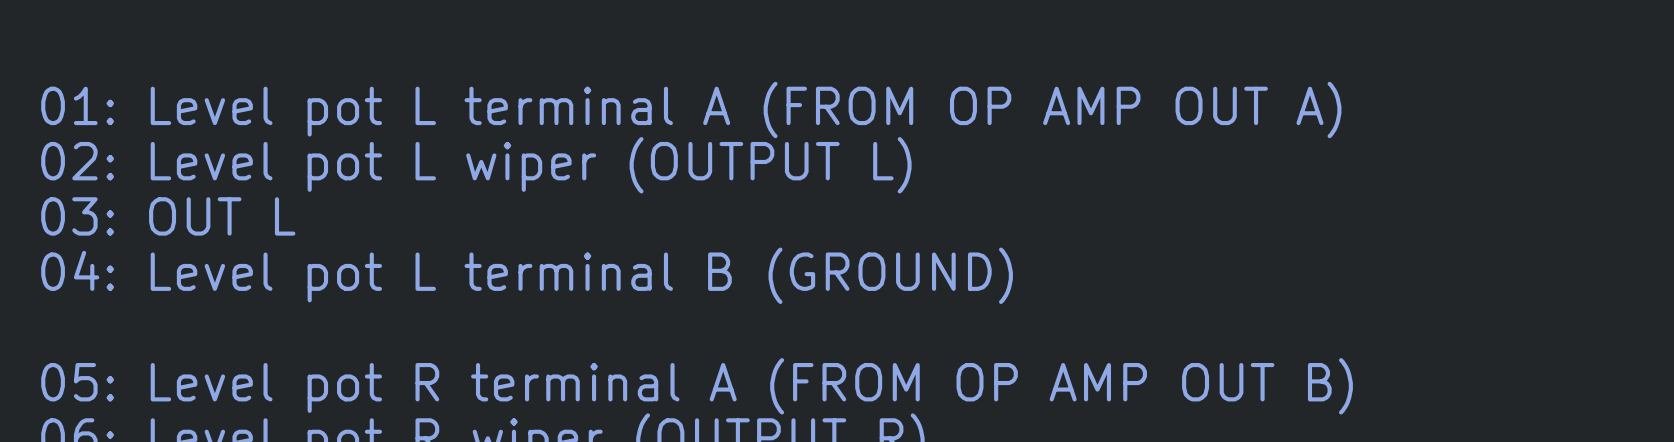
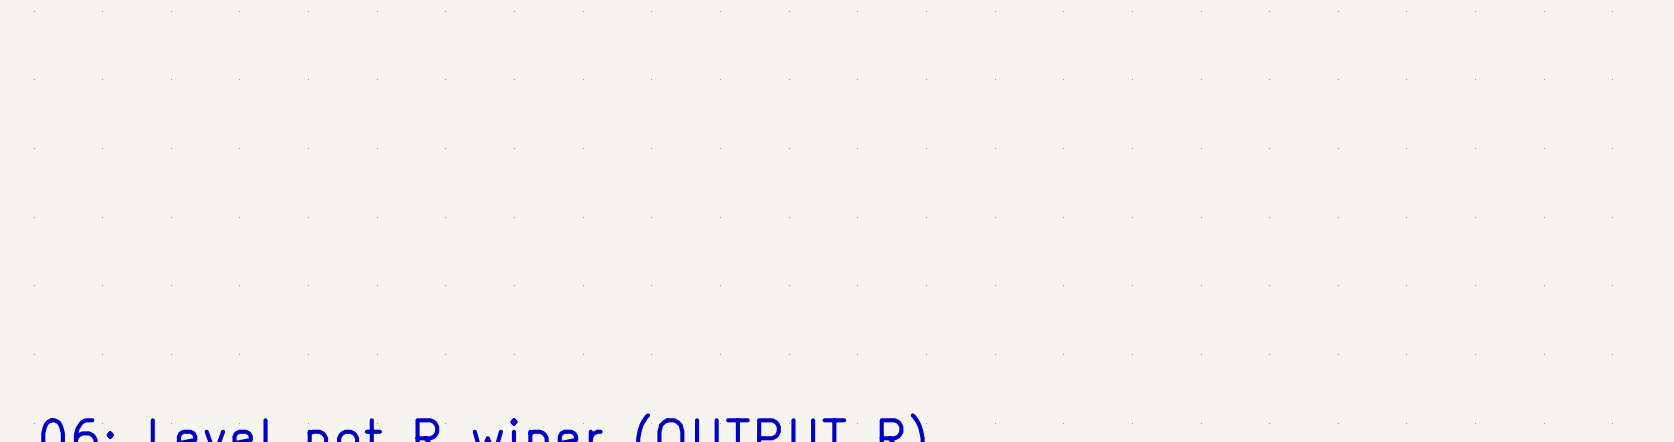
text: 01: Level pot L terminal A (FROM OP AMP OUT A) (691, 109) -> none
text: 02: Level pot L wiper (OUTPUT L) (476, 165) -> none
text: 03: OUT L (168, 216) -> none
text: 04: Level pot L terminal B (GROUND) (527, 275) -> none
text: 05: Level pot R terminal A (FROM OP AMP OUT B) (697, 386) -> none

